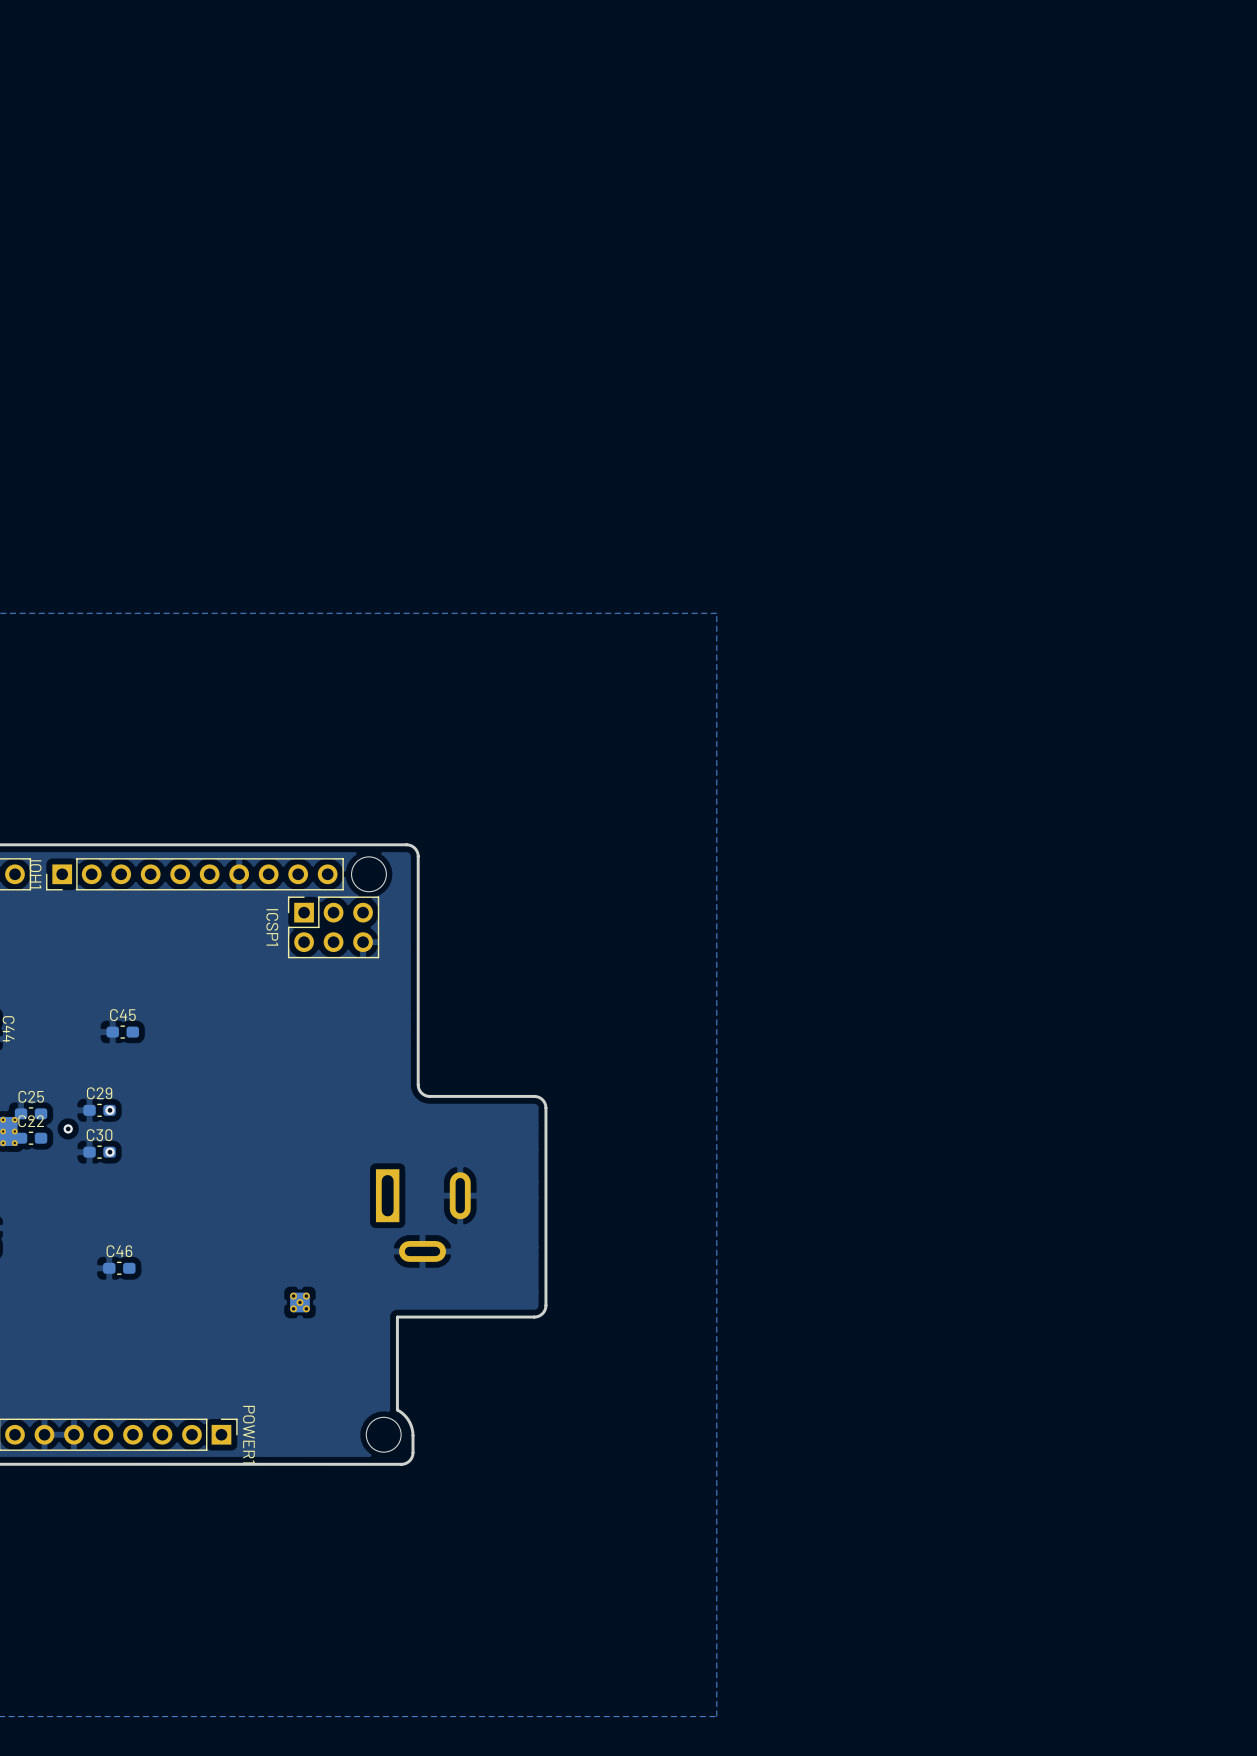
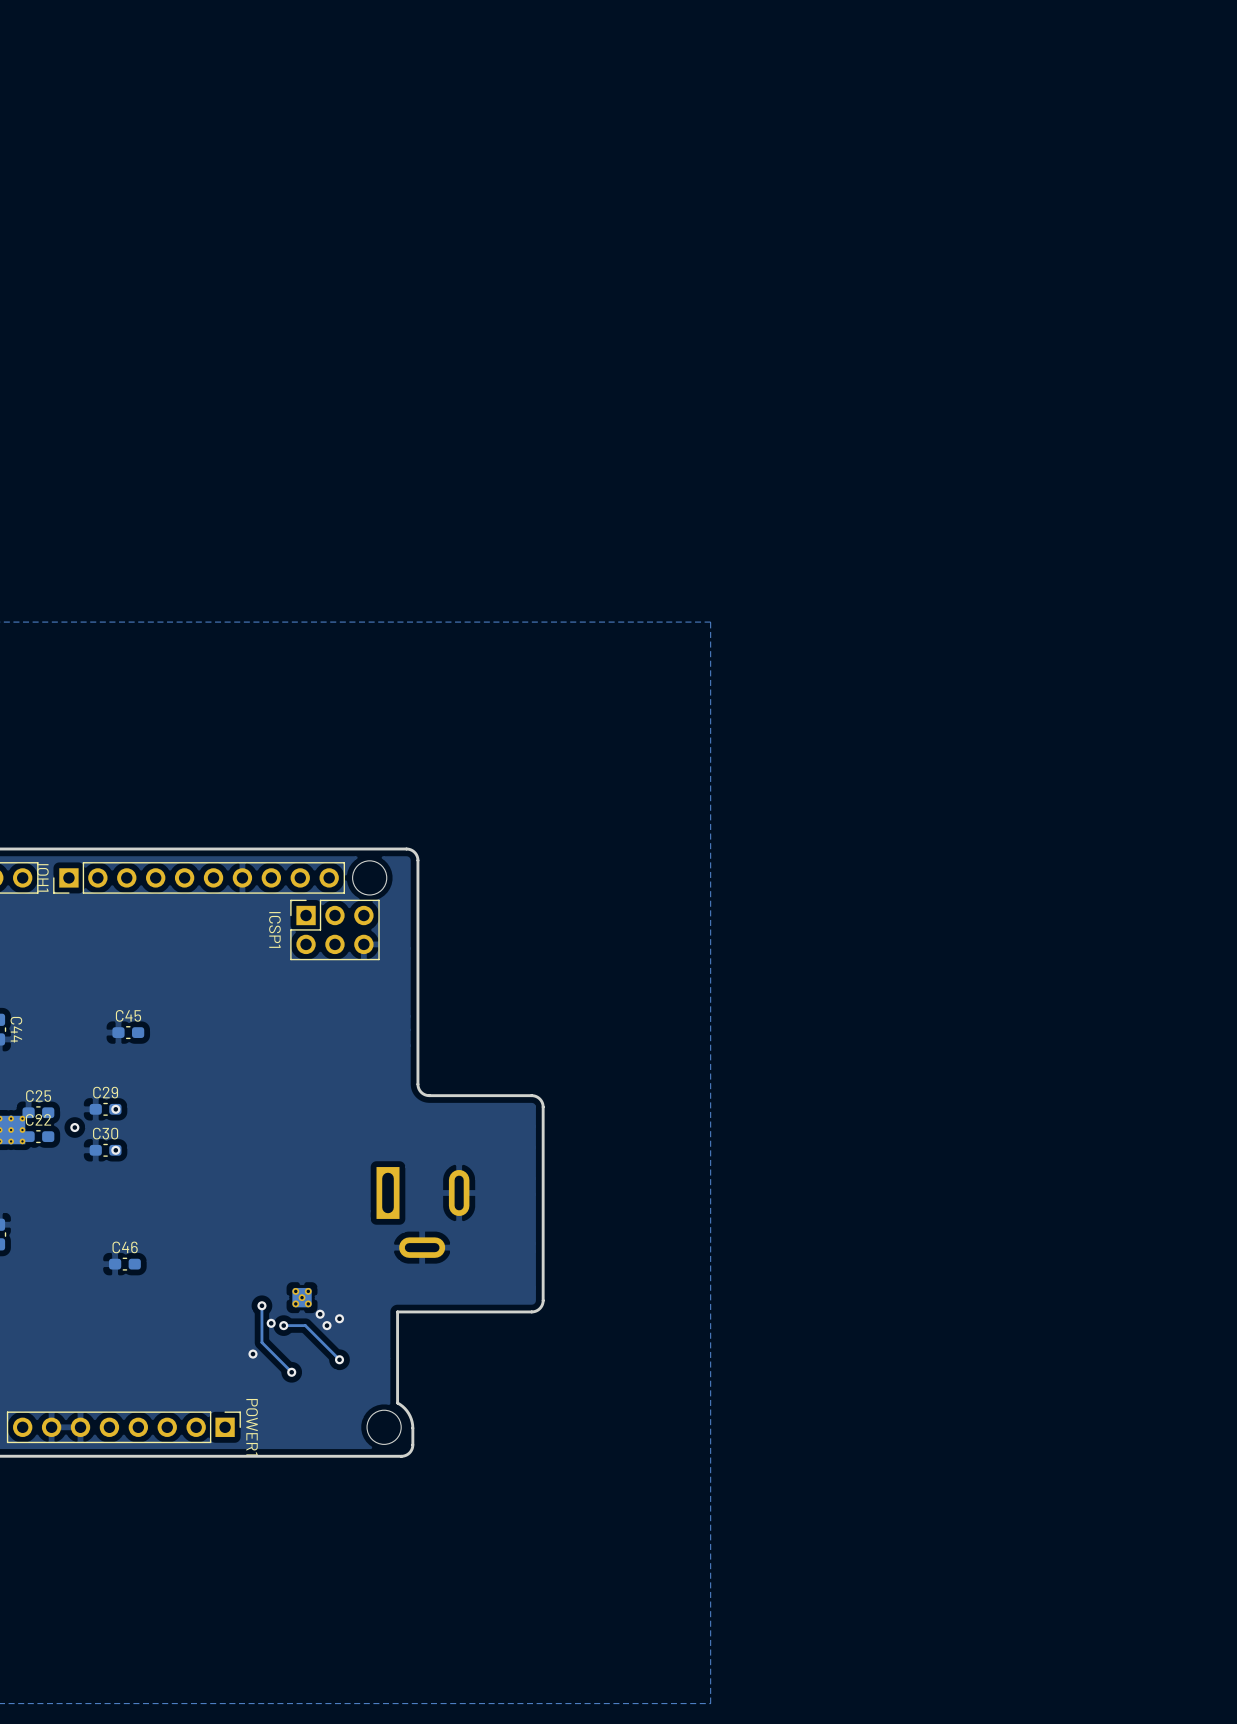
track: none -> (261, 1305) (261, 1342) (291, 1372)
via: none -> (261, 1305)
via: none -> (320, 1314)
via: none -> (339, 1318)
via: none -> (271, 1323)
track: none -> (283, 1325) (305, 1325) (339, 1359)
via: none -> (283, 1325)
via: none -> (326, 1325)
via: none -> (252, 1354)
via: none -> (339, 1359)
via: none -> (291, 1372)

